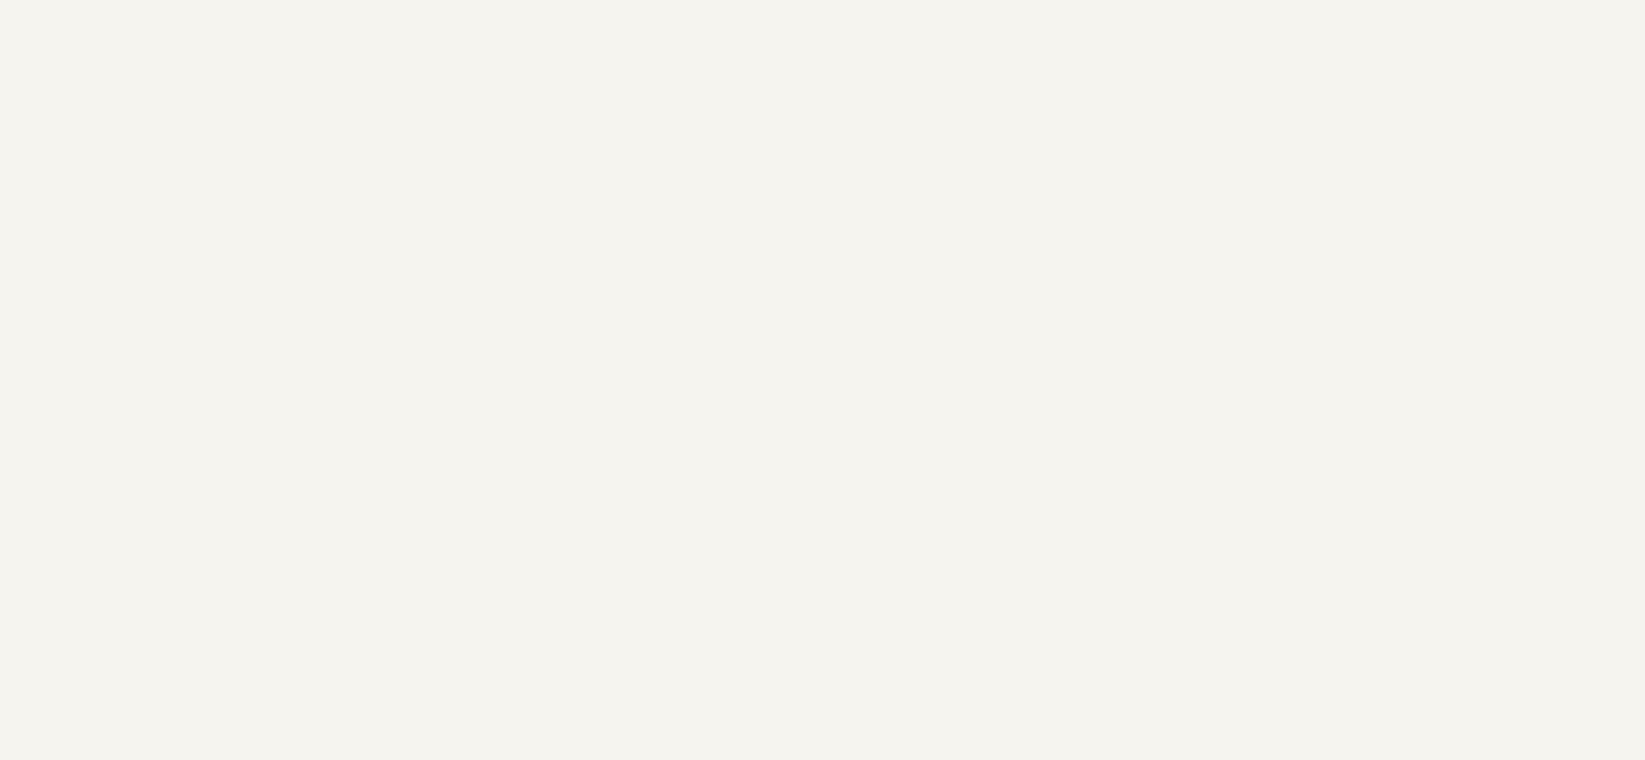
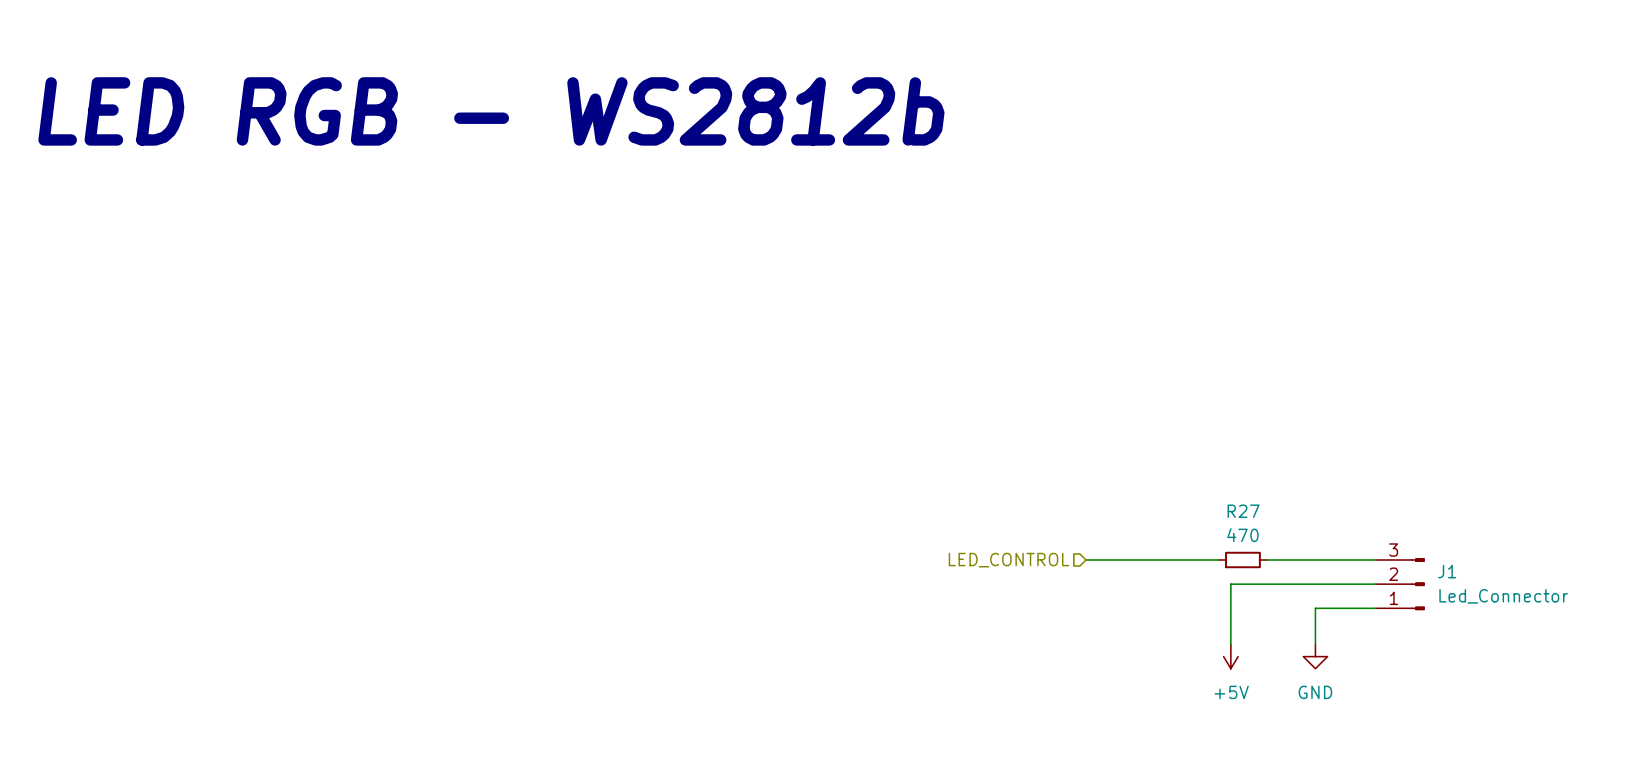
text: none -> LED RGB - WS2812b (491, 111)
hierarchical label: none -> LED_CONTROL (1008, 560)
wire: none -> (1085, 560) (1218, 560)
R27: none -> 470 (1242, 560)
wire: none -> (1267, 560) (1375, 560)
wire: none -> (1375, 584) (1230, 584) (1230, 644)
J1: none -> Led_Connector (1400, 584)
wire: none -> (1375, 608) (1315, 608) (1315, 644)
power symbol: none -> +5V (1230, 656)
power symbol: none -> GND (1315, 656)

